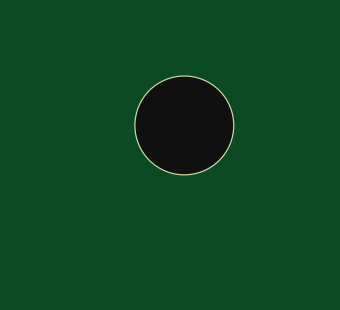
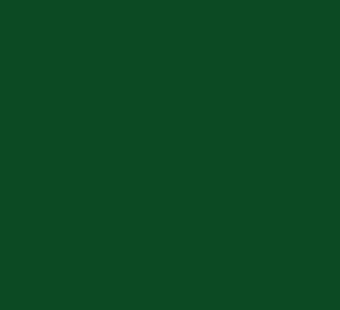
part: (184, 125) -> none

